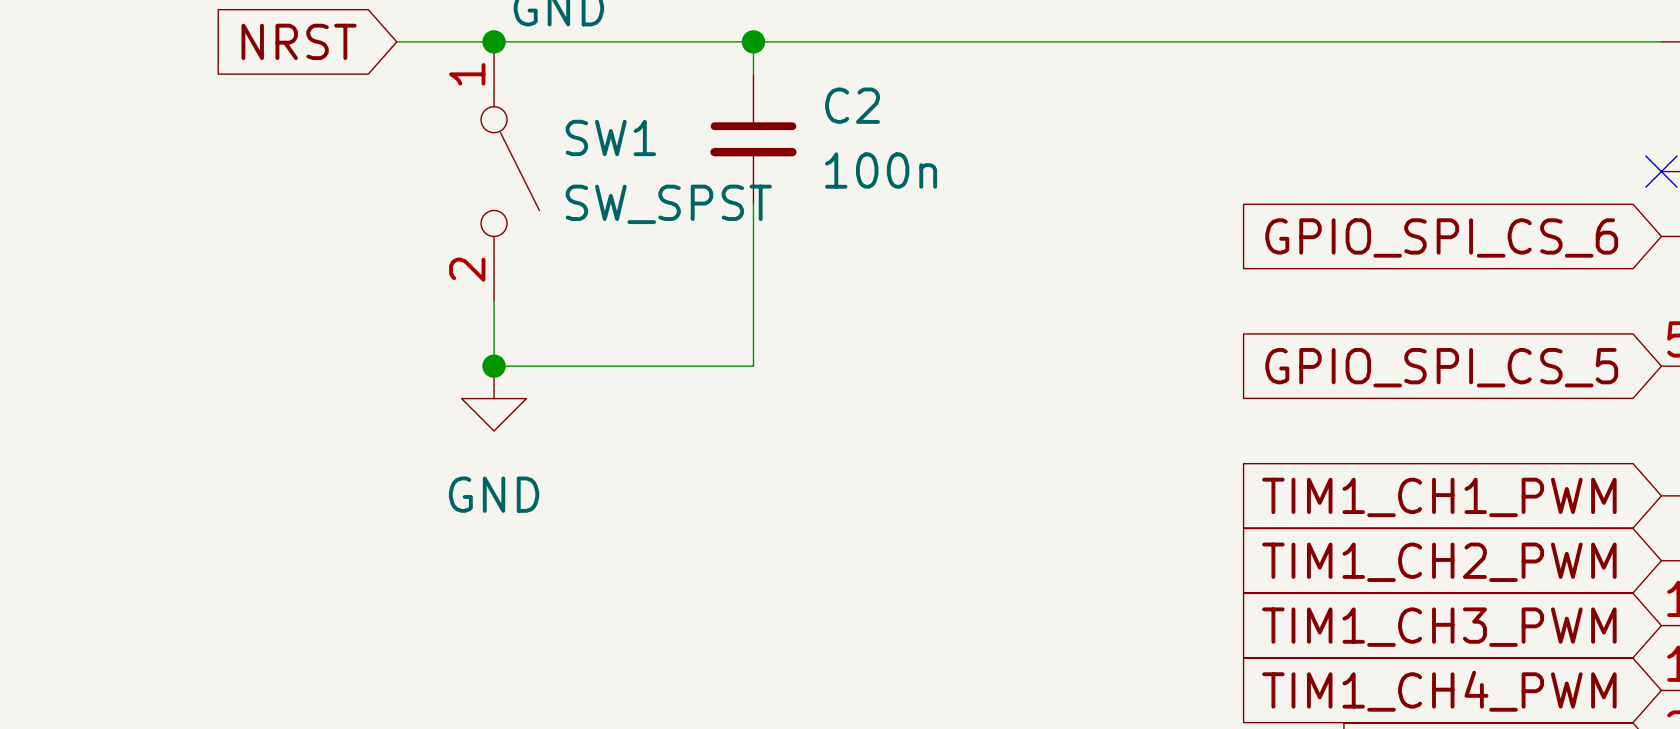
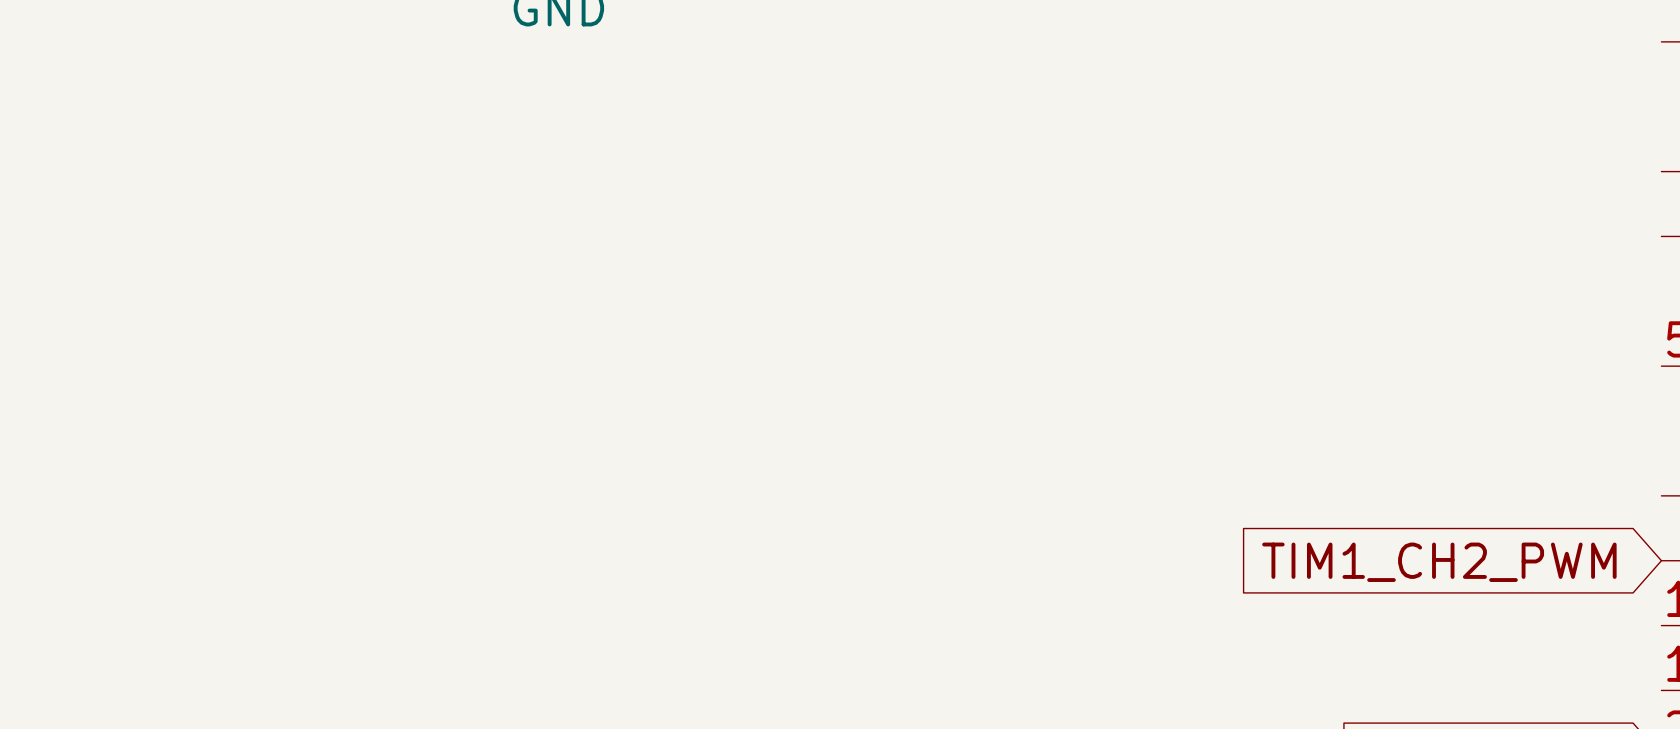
global label: NRST (299, 41) -> none
wire: (396, 41) (1661, 41) -> none
junction: (494, 41) -> none
wire: (753, 41) (753, 74) -> none
junction: (753, 41) -> none
C2: 100n (753, 139) -> none
SW1: SW_SPST (510, 171) -> none
no-connect mark: (1661, 171) -> none
wire: (753, 204) (753, 366) (494, 366) (494, 301) -> none
global label: GPIO_SPI_CS_6 (1441, 237) -> none
junction: (494, 366) -> none
global label: GPIO_SPI_CS_5 (1441, 367) -> none
power symbol: GND (494, 398) -> none
global label: TIM1_CH1_PWM (1439, 497) -> none
global label: TIM1_CH3_PWM (1439, 627) -> none
global label: TIM1_CH4_PWM (1439, 691) -> none

